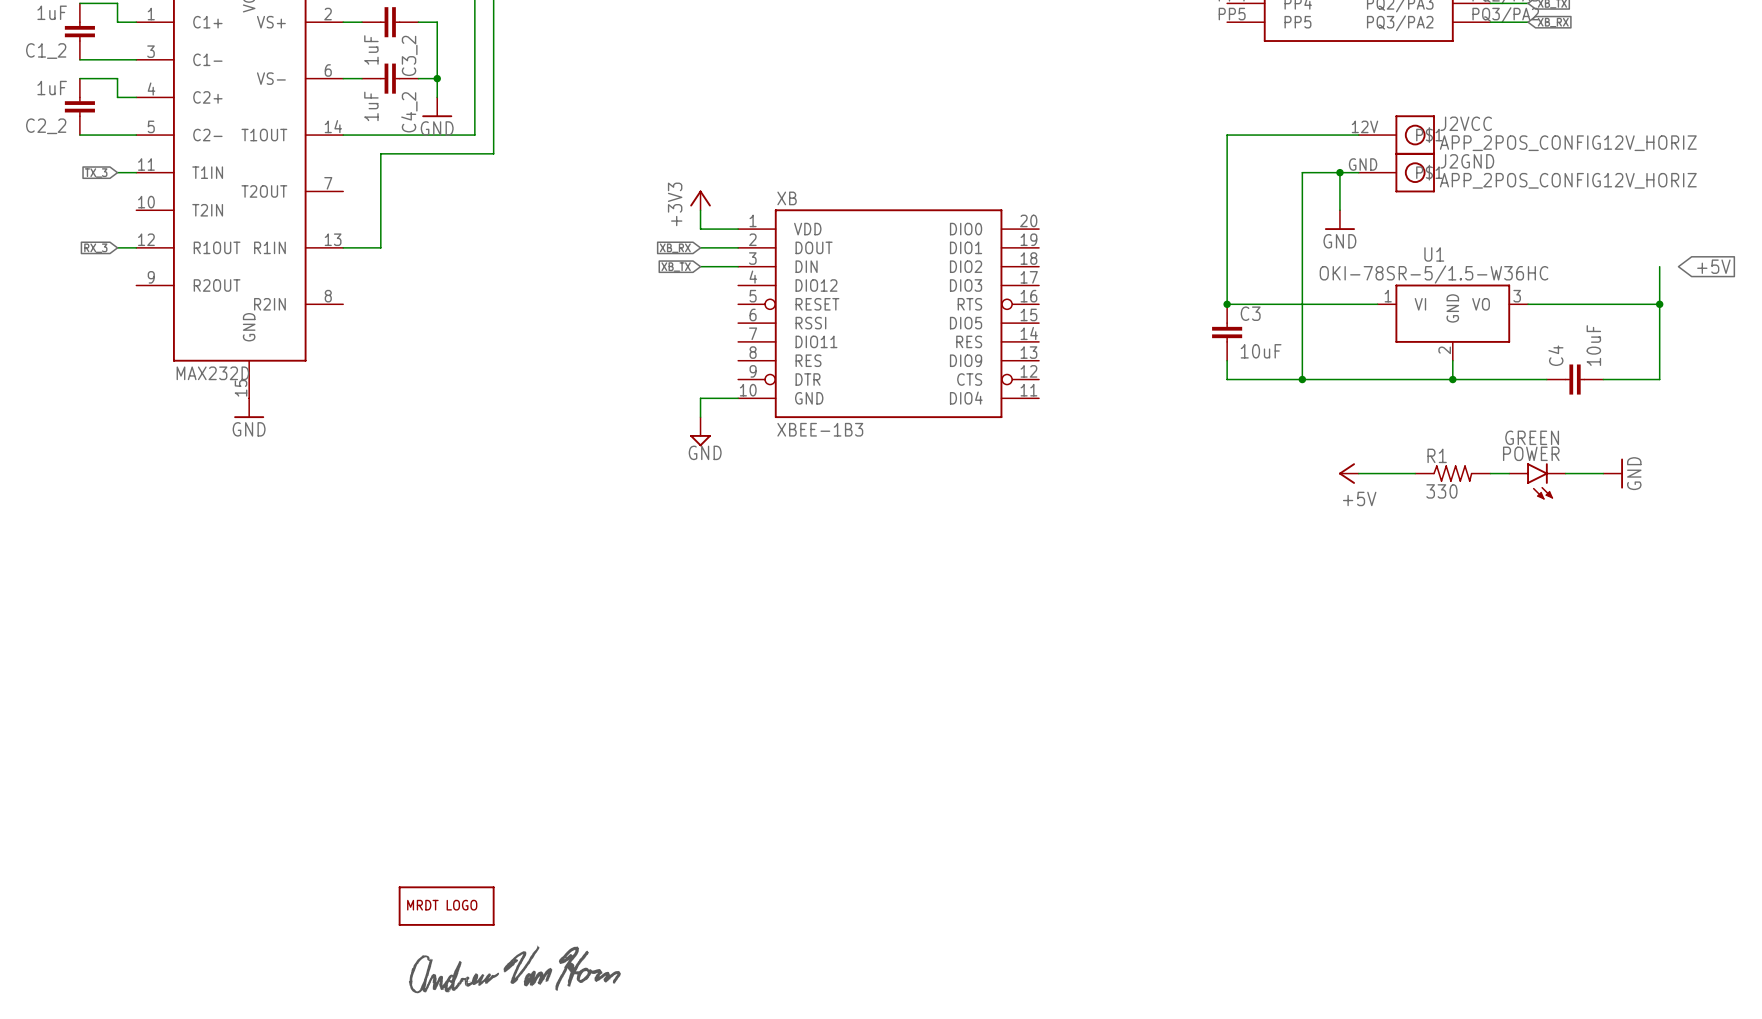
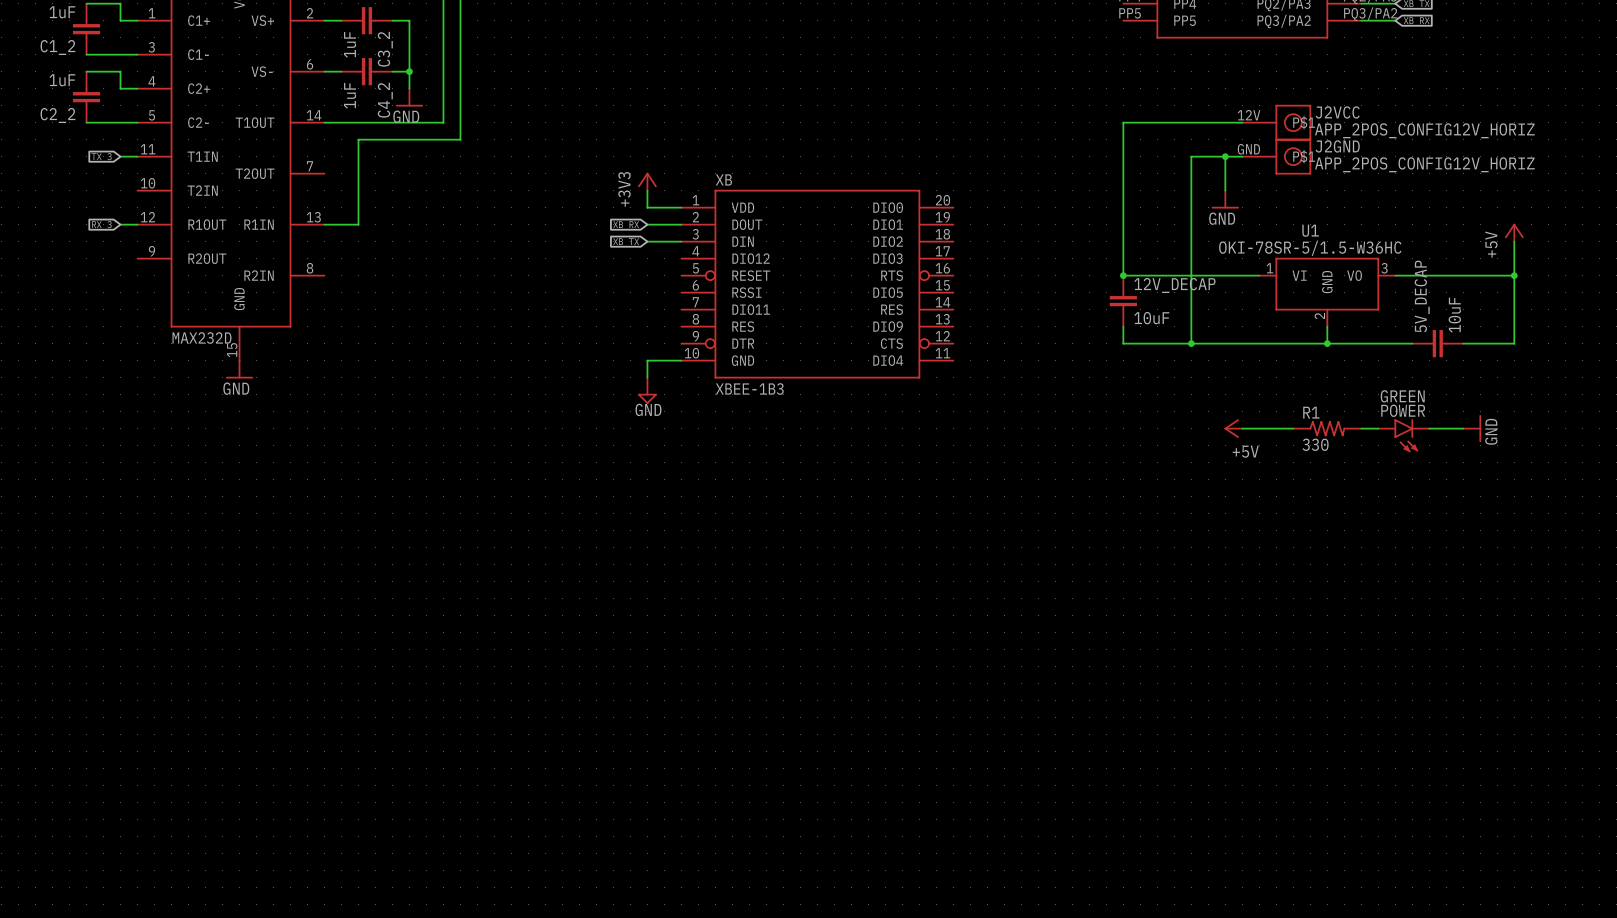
power symbol: none -> +5V (1514, 232)
global label: +5V (1713, 266) -> none
C3 name: C3 (1250, 313) -> 12V_DECAP (1174, 285)
C4 name: C4 (1555, 355) -> 5V_DECAP (1422, 296)
part: (446, 906) -> none
part: (514, 969) -> none

